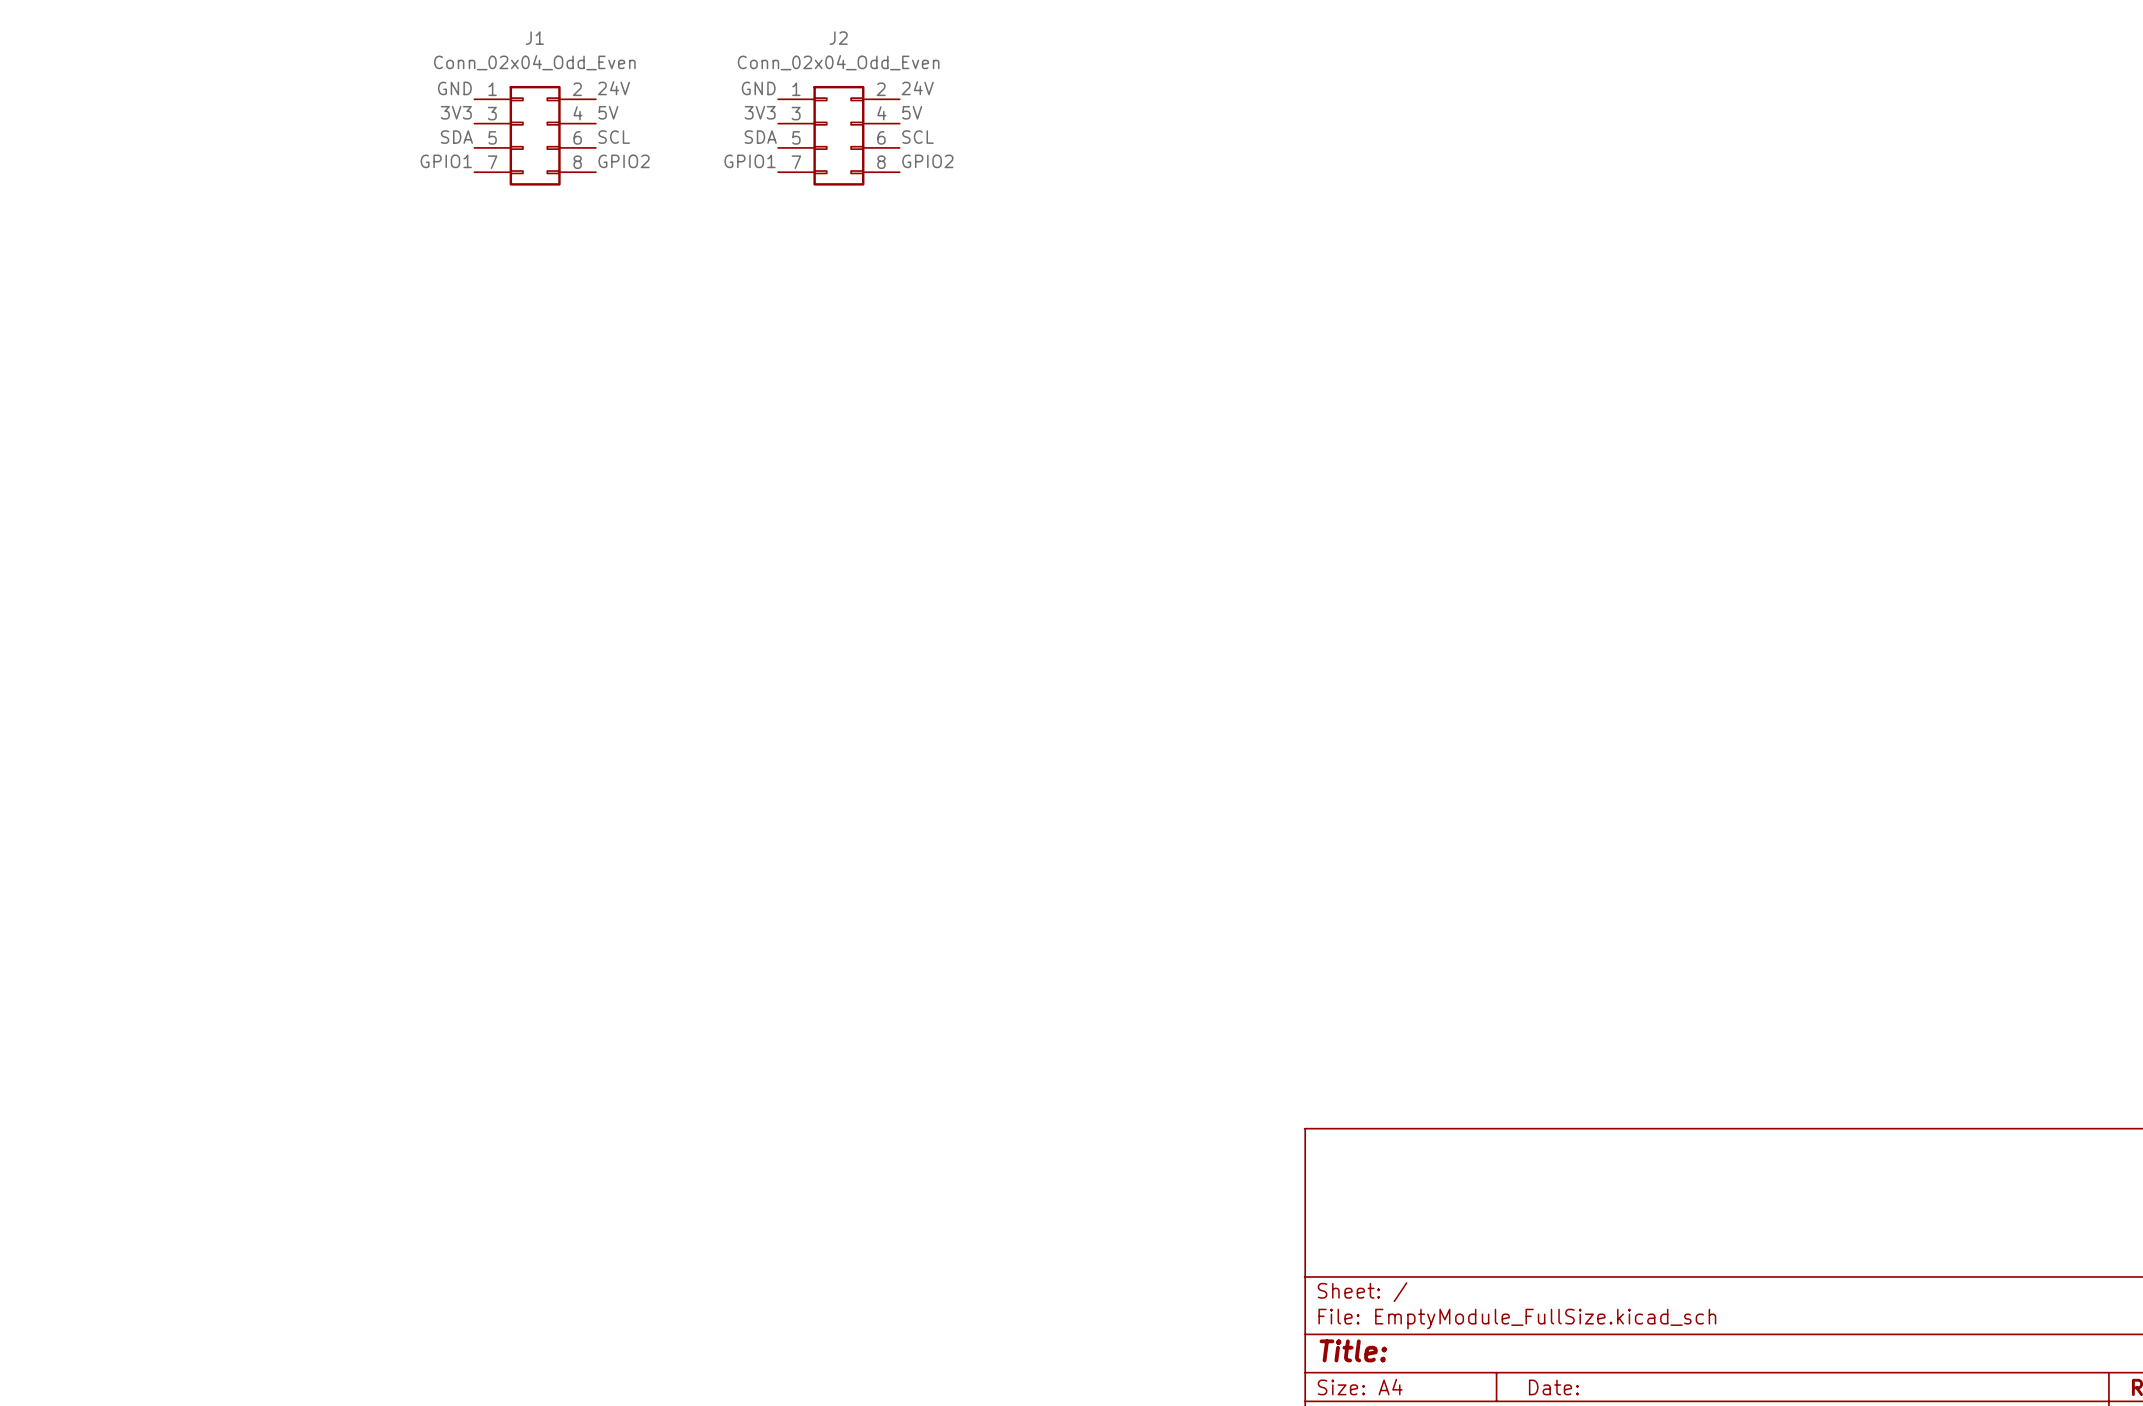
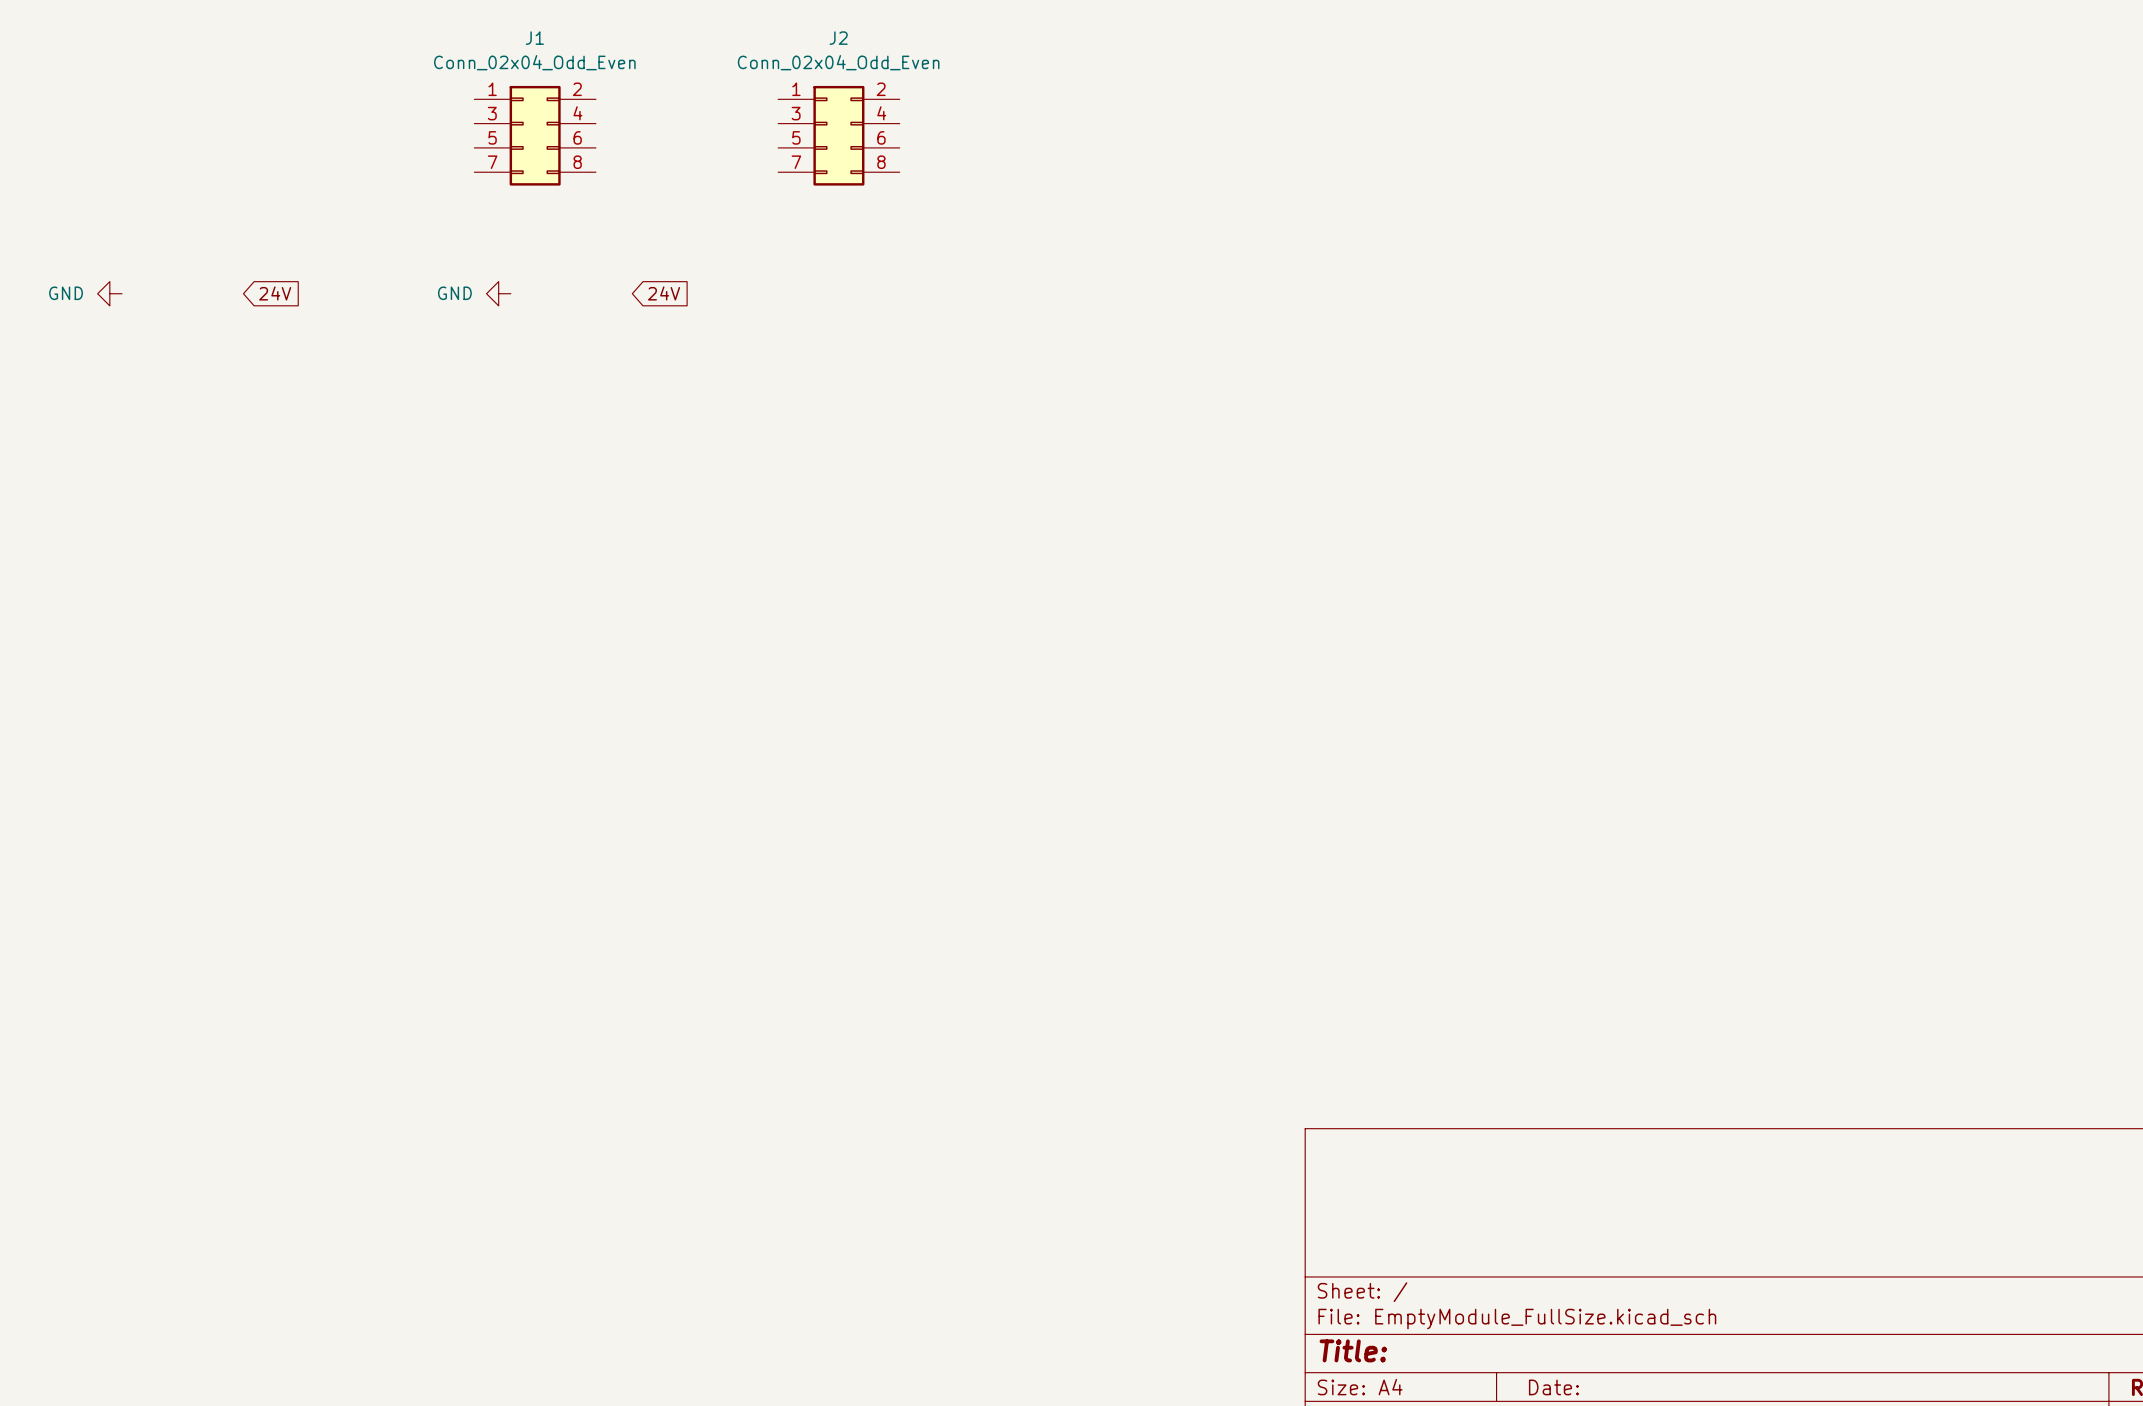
label: GND (454, 88) -> none
label: 24V (613, 88) -> none
label: GND (758, 88) -> none
label: 24V (917, 88) -> none
label: 3V3 (456, 112) -> none
label: 5V (608, 112) -> none
label: 3V3 (760, 112) -> none
label: 5V (912, 112) -> none
label: SDA (456, 137) -> none
label: SCL (614, 137) -> none
label: SDA (760, 137) -> none
label: SCL (918, 137) -> none
label: GPIO1 (446, 161) -> none
label: GPIO2 (624, 161) -> none
label: GPIO1 (750, 161) -> none
label: GPIO2 (927, 161) -> none
power symbol: none -> GND (109, 293)
global label: none -> 24V (275, 293)
power symbol: none -> GND (498, 293)
global label: none -> 24V (664, 293)

